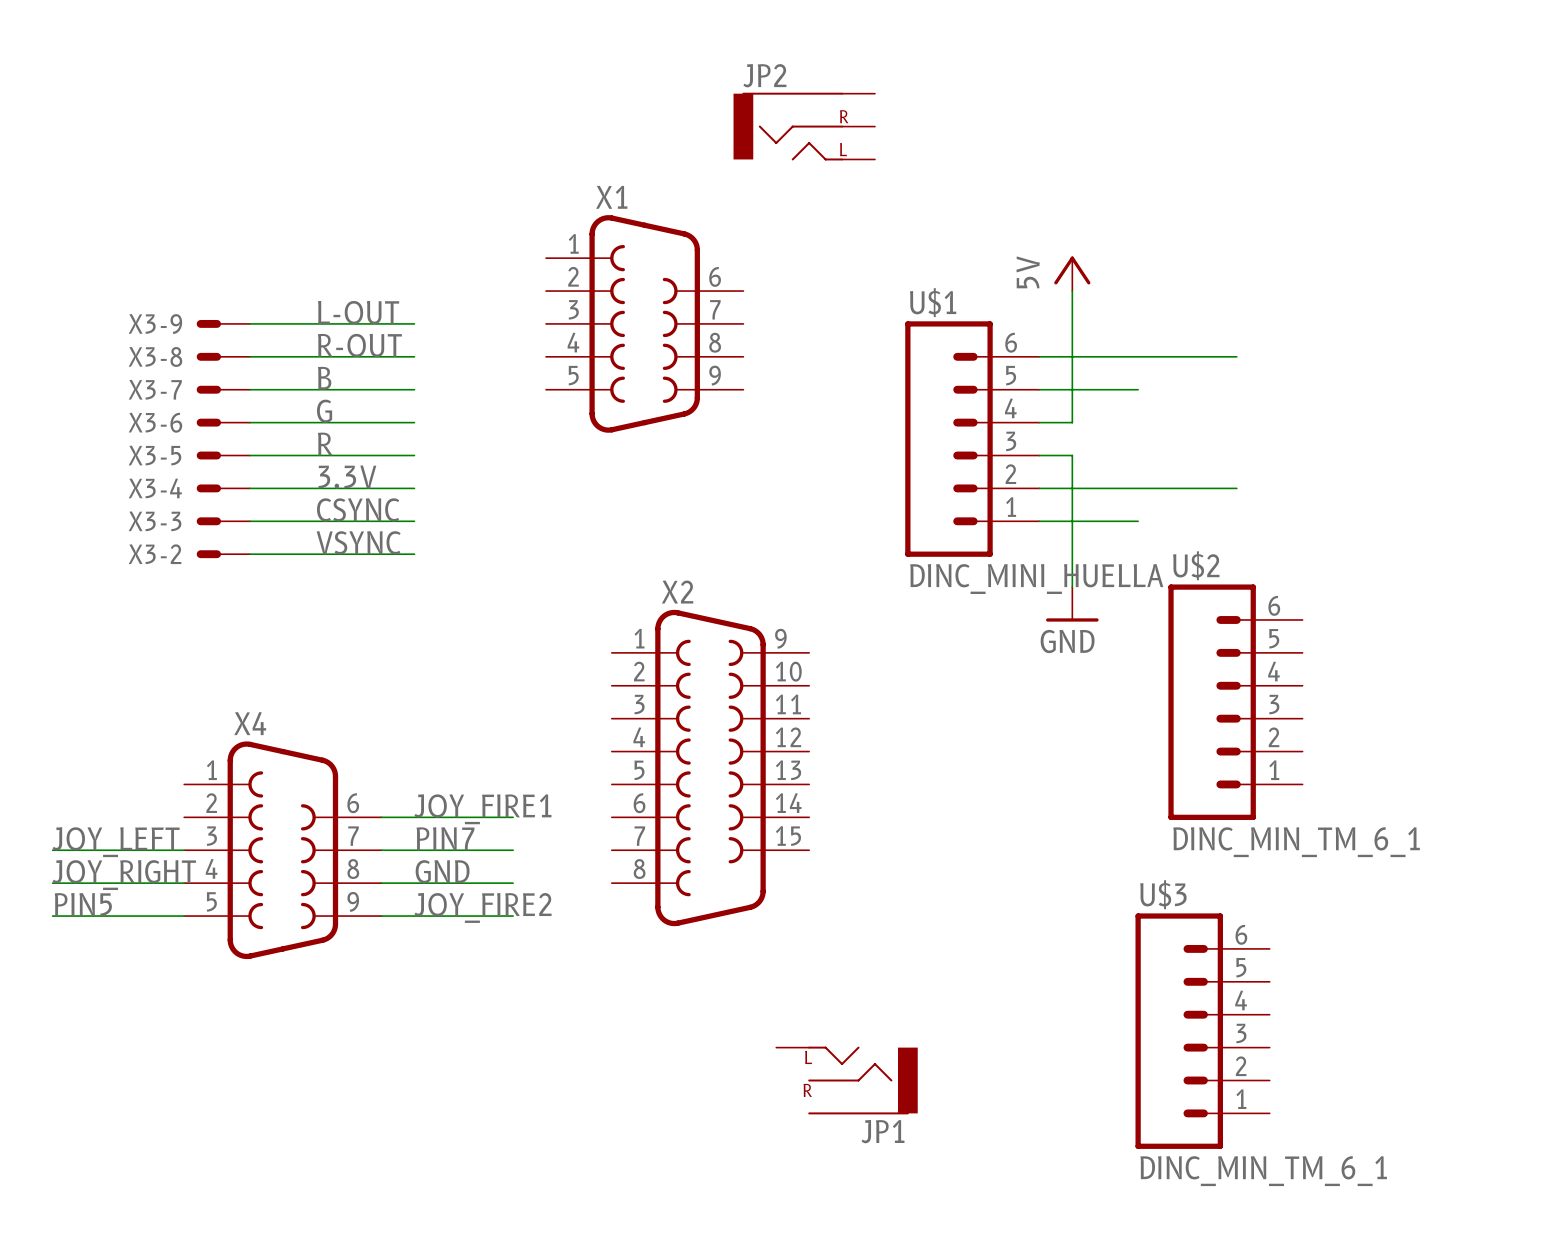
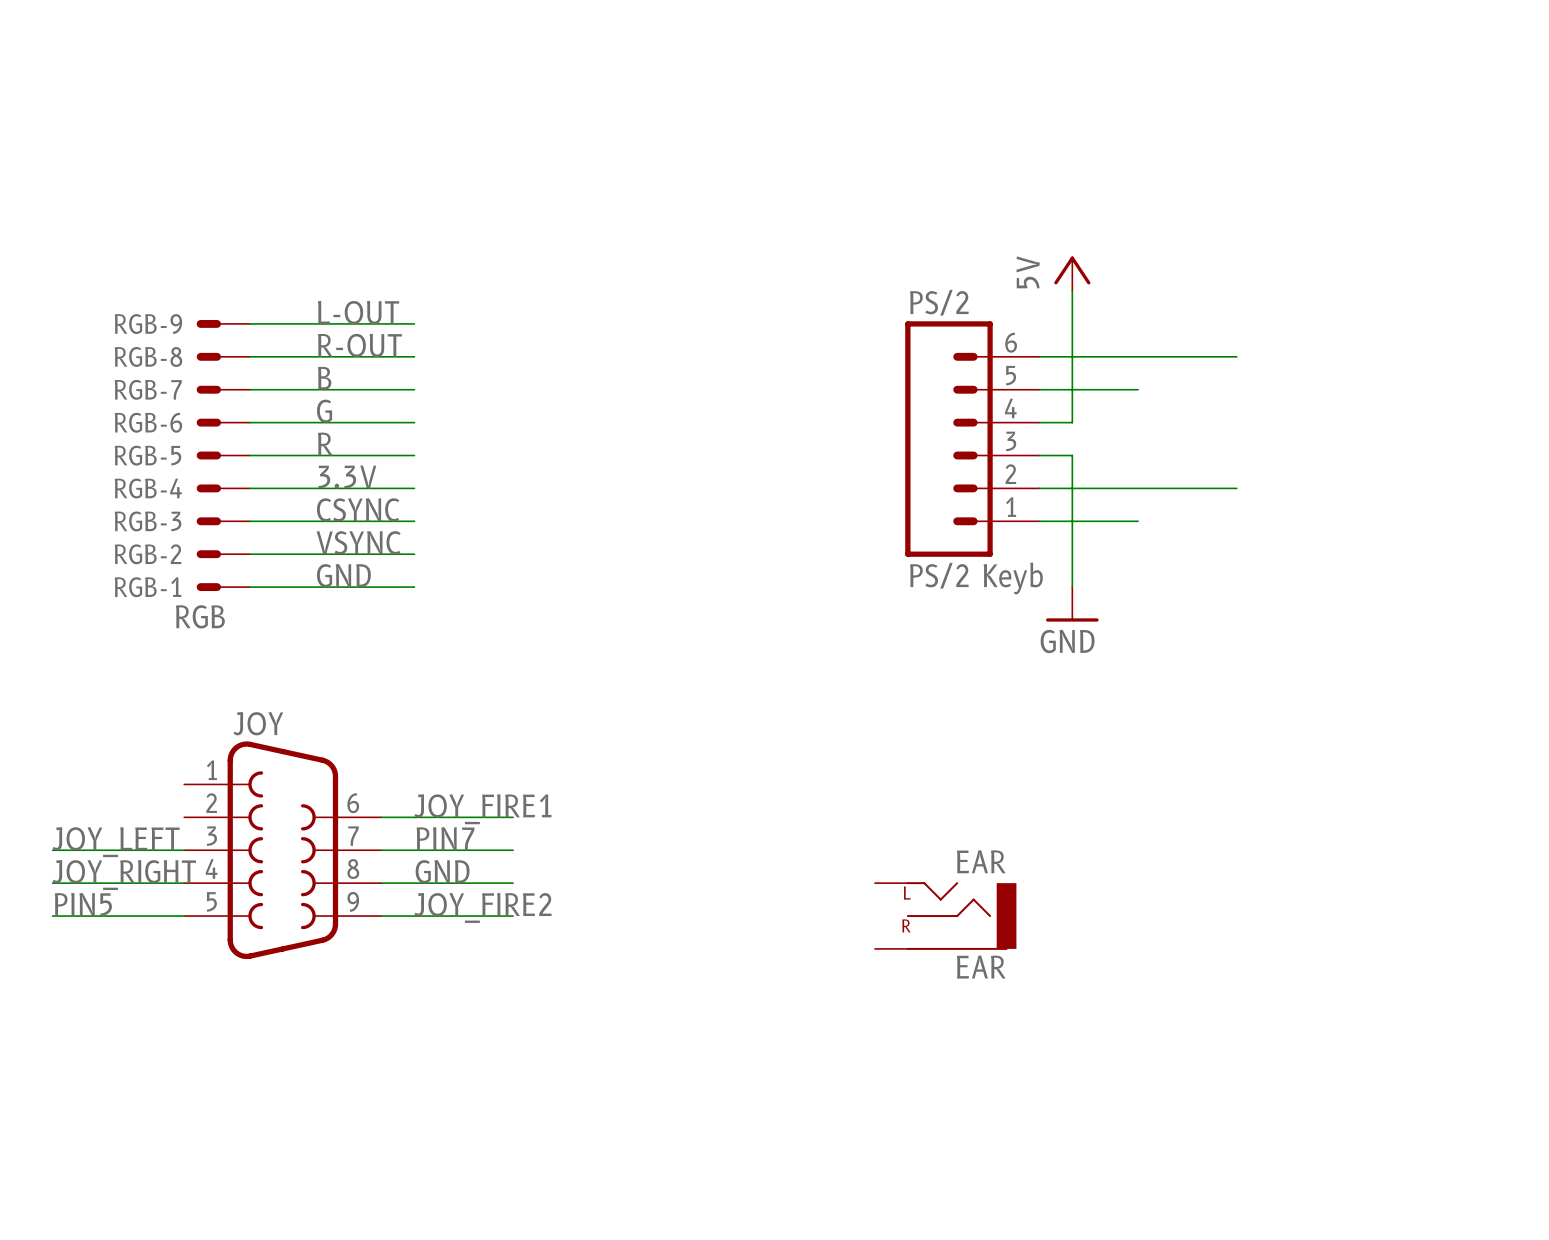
JP2: (804, 126) -> none
U$1 name: U$1 (933, 302) -> PS/2 (939, 302)
X1: (644, 323) -> none
X3-9 name: X3-9 (155, 324) -> RGB-9 (148, 324)
X3-8 name: X3-8 (155, 356) -> RGB-8 (148, 356)
X3-7 name: X3-7 (155, 389) -> RGB-7 (148, 389)
X3-6 name: X3-6 (155, 422) -> RGB-6 (148, 422)
X3-5 name: X3-5 (154, 455) -> RGB-5 (147, 455)
X3-4 name: X3-4 (155, 488) -> RGB-4 (148, 488)
X3-3 name: X3-3 (155, 521) -> RGB-3 (148, 521)
X3-2 name: X3-2 (155, 554) -> RGB-2 (148, 554)
label: none -> GND (343, 575)
U$1 value: DINC_MINI_HUELLA (1036, 579) -> PS/2 Keyb (976, 578)
RGB-1: none -> RGB (223, 587)
wire: none -> (249, 587) (414, 587)
U$2: DINC_MIN_TM_6_1 (1235, 702) -> none
X4 name: X4 (250, 723) -> JOY (258, 723)
X2: (710, 768) -> none
EAR: none -> EAR (945, 916)
U$3: DINC_MIN_TM_6_1 (1202, 1031) -> none
JP1: (847, 1080) -> none

